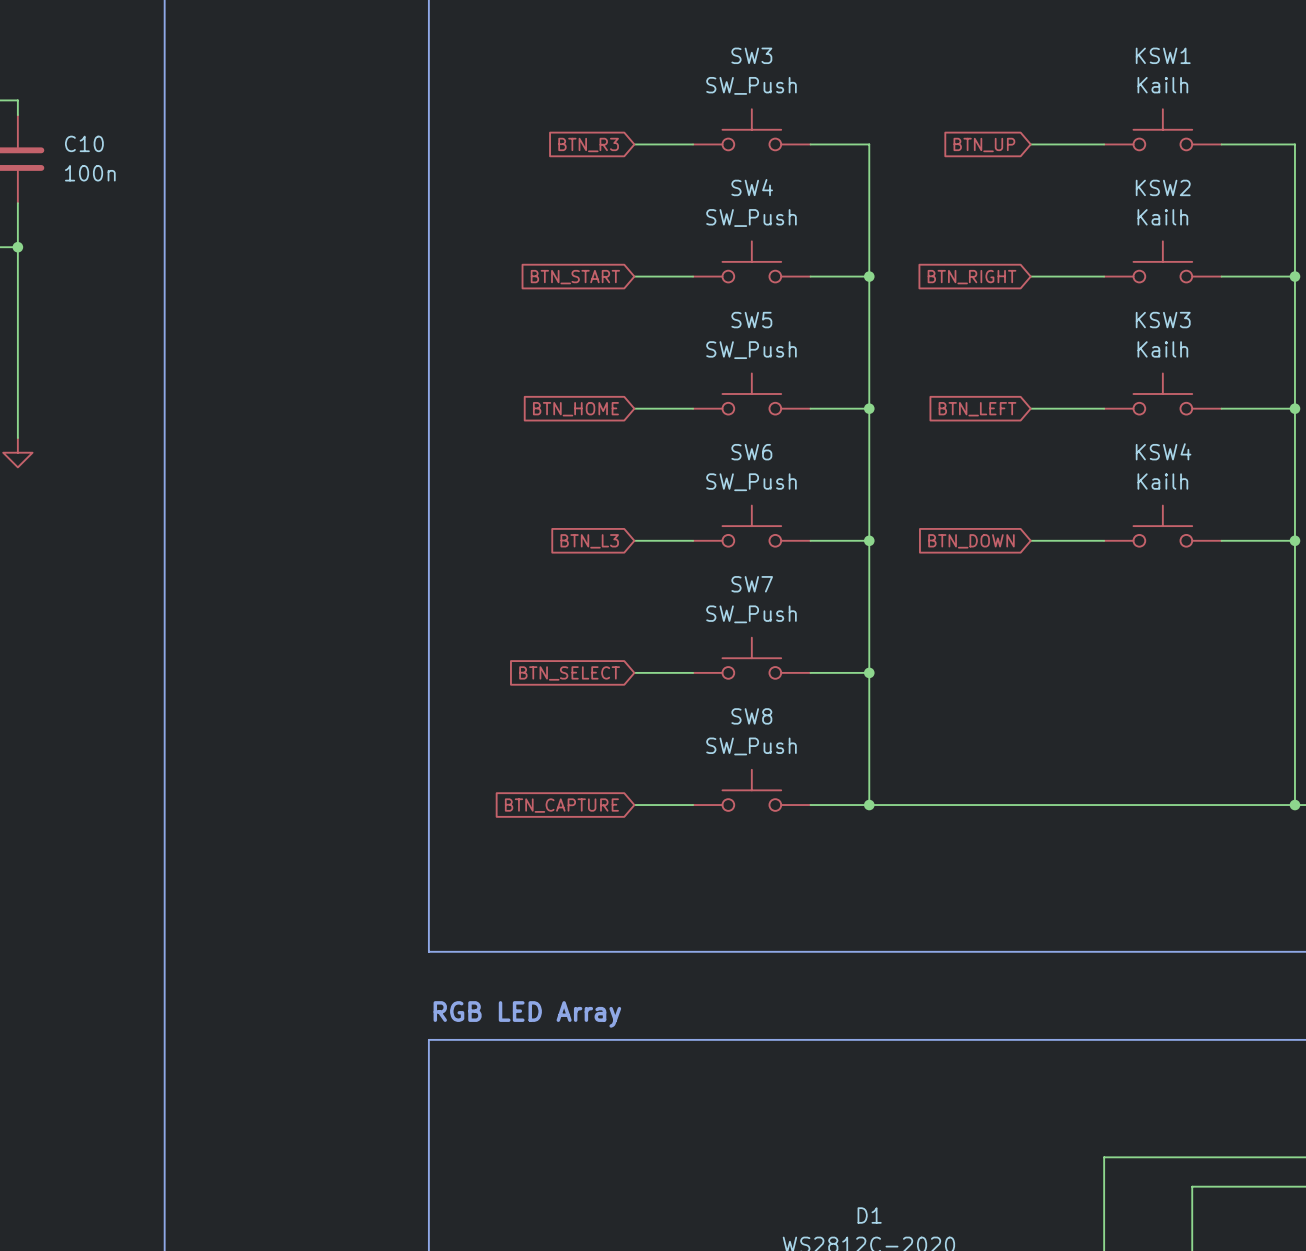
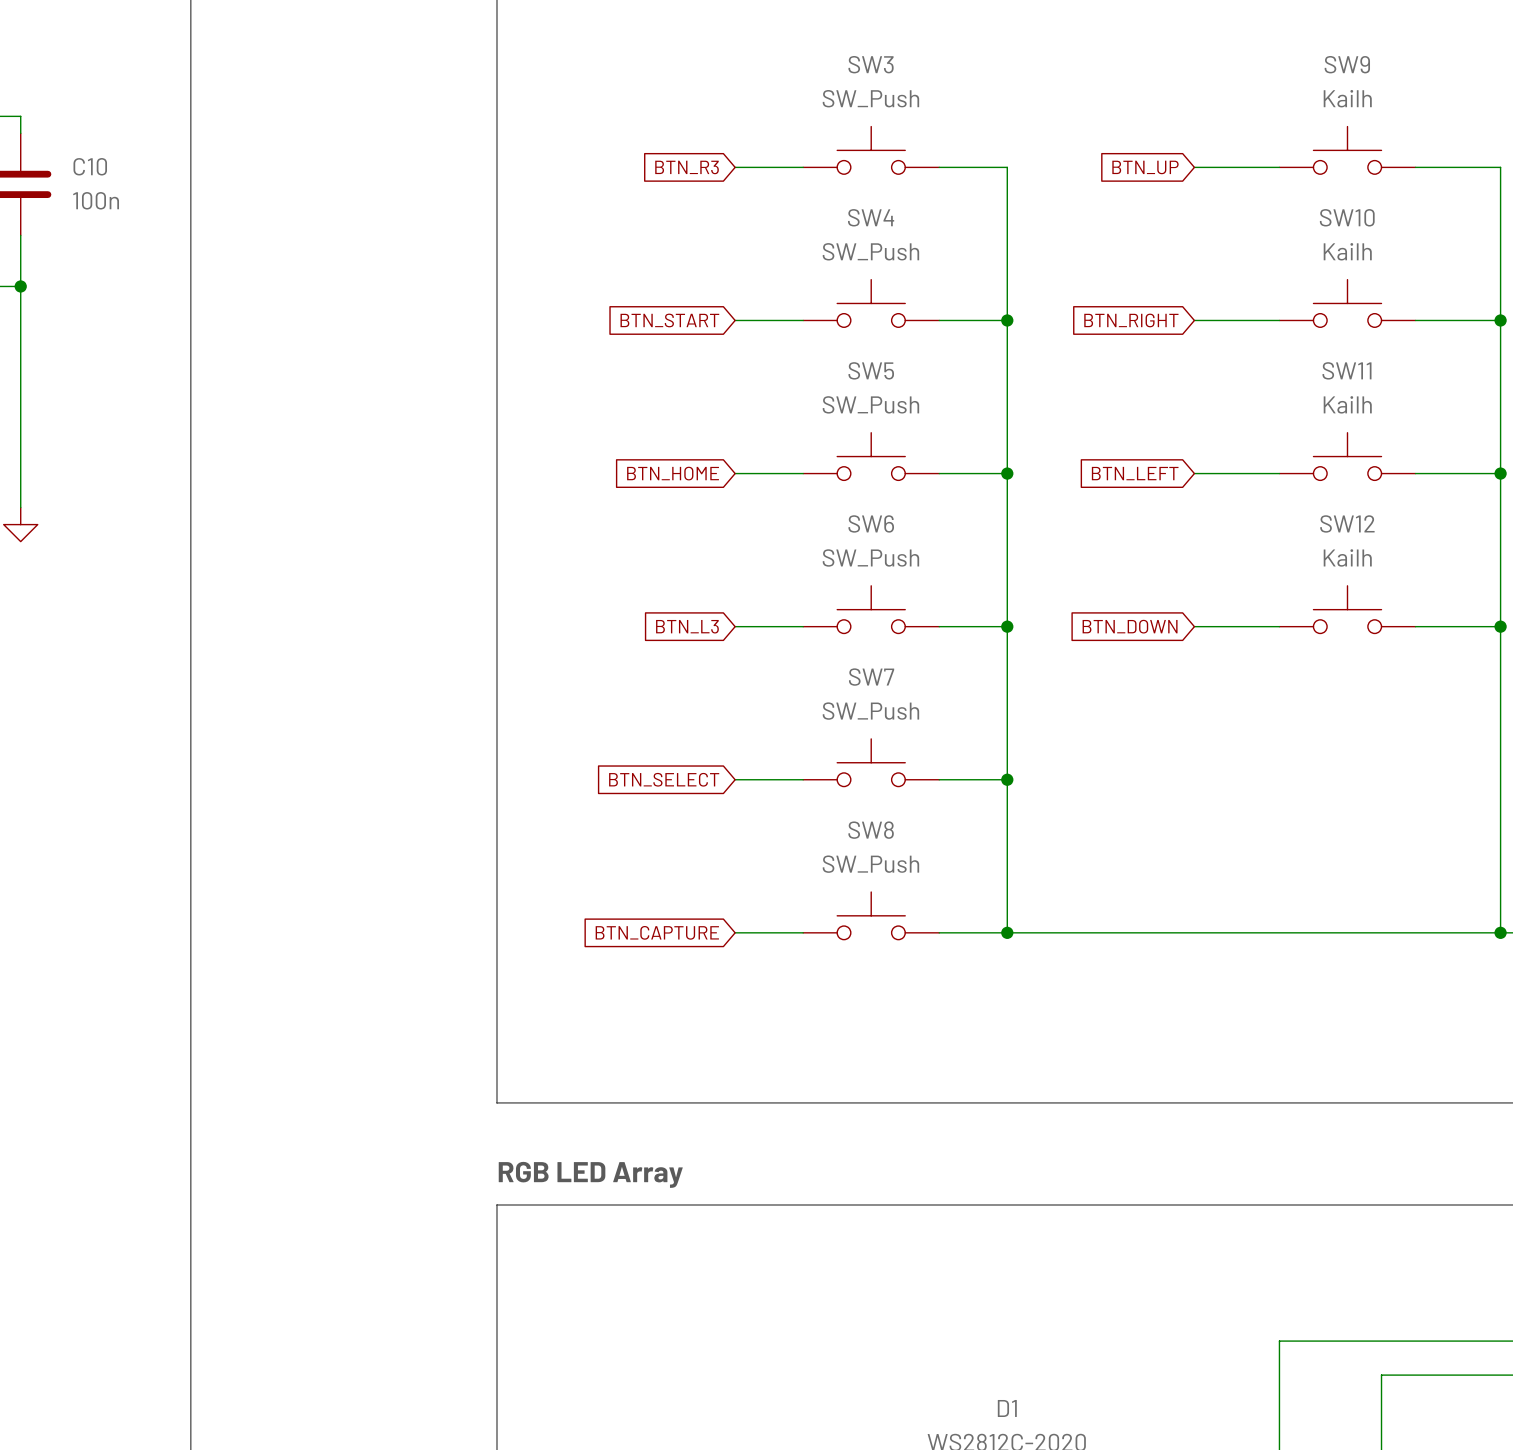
KSW1 name: KSW1 (1163, 55) -> SW9 (1347, 64)
KSW2 name: KSW2 (1163, 187) -> SW10 (1347, 217)
KSW3 name: KSW3 (1163, 320) -> SW11 (1346, 370)
KSW4 name: KSW4 (1163, 451) -> SW12 (1347, 523)

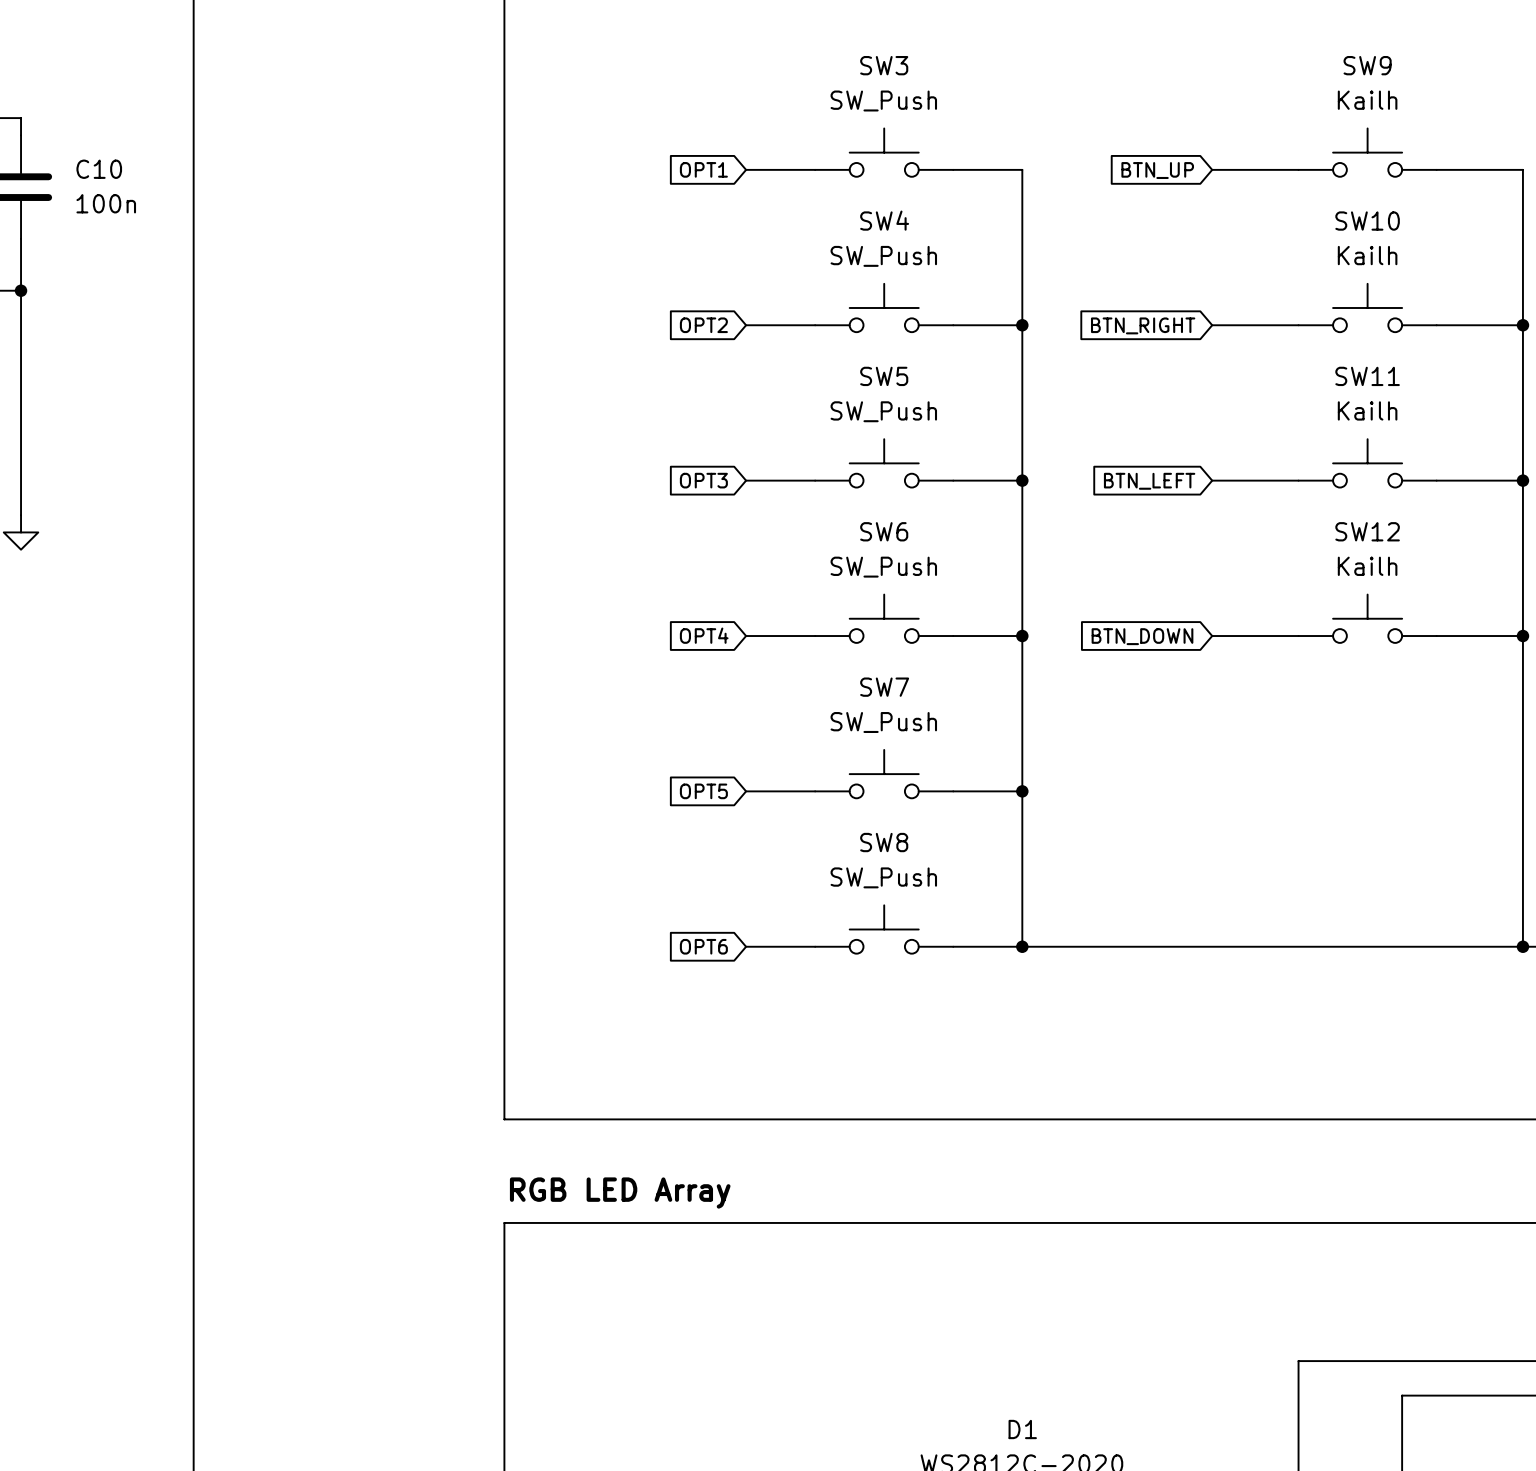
global label: BTN_R3 (687, 167) -> OPT1 (703, 169)
global label: BTN_START (669, 320) -> OPT2 (703, 325)
global label: BTN_HOME (673, 473) -> OPT3 (703, 480)
global label: BTN_L3 (687, 626) -> OPT4 (704, 635)
global label: BTN_SELECT (664, 779) -> OPT5 (703, 791)
global label: BTN_CAPTURE (657, 932) -> OPT6 (703, 946)

